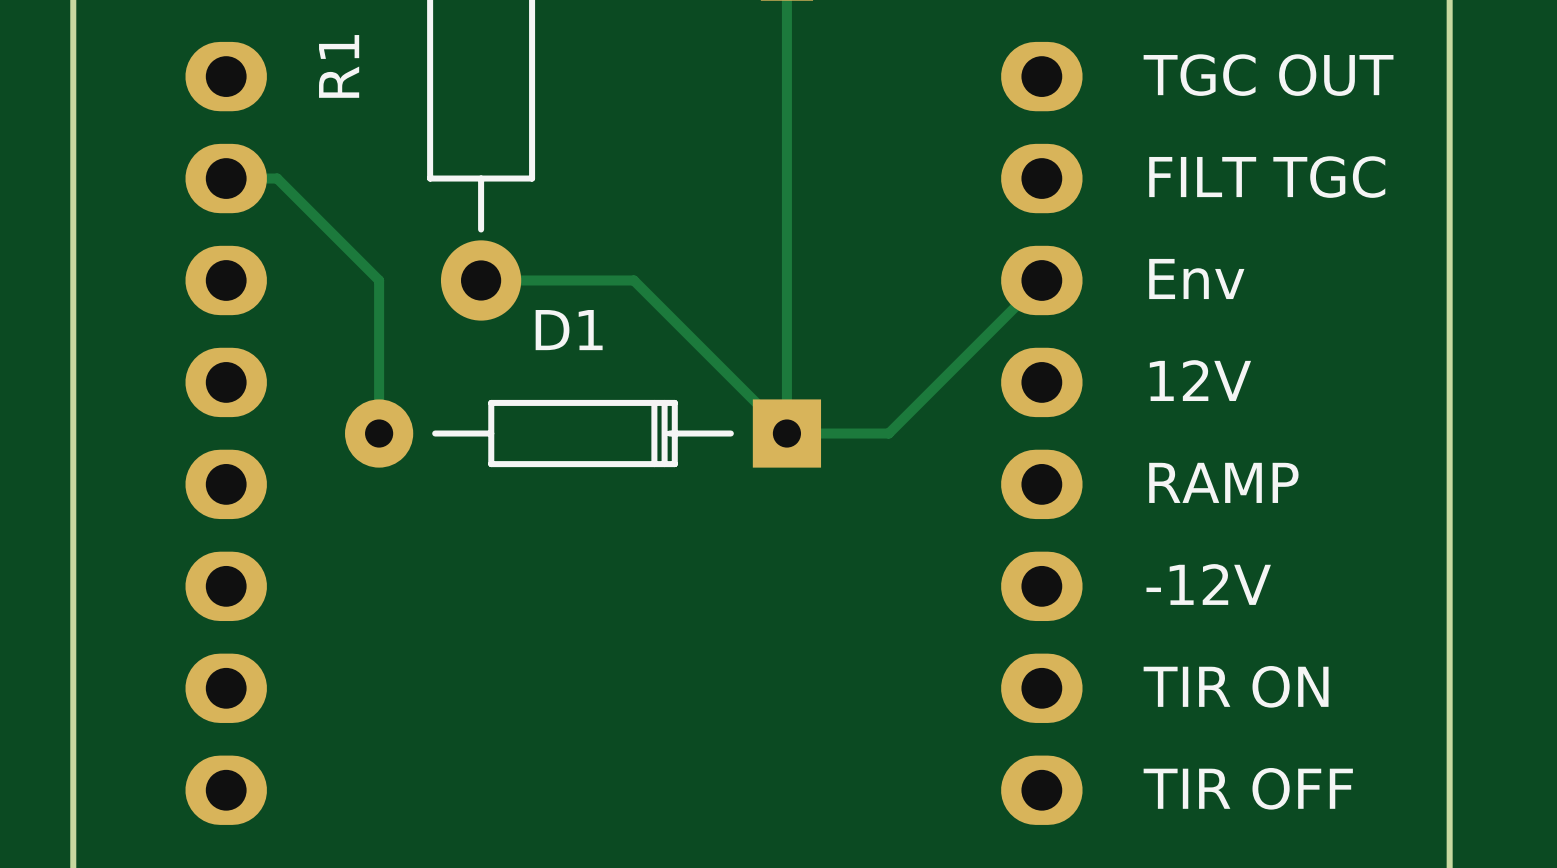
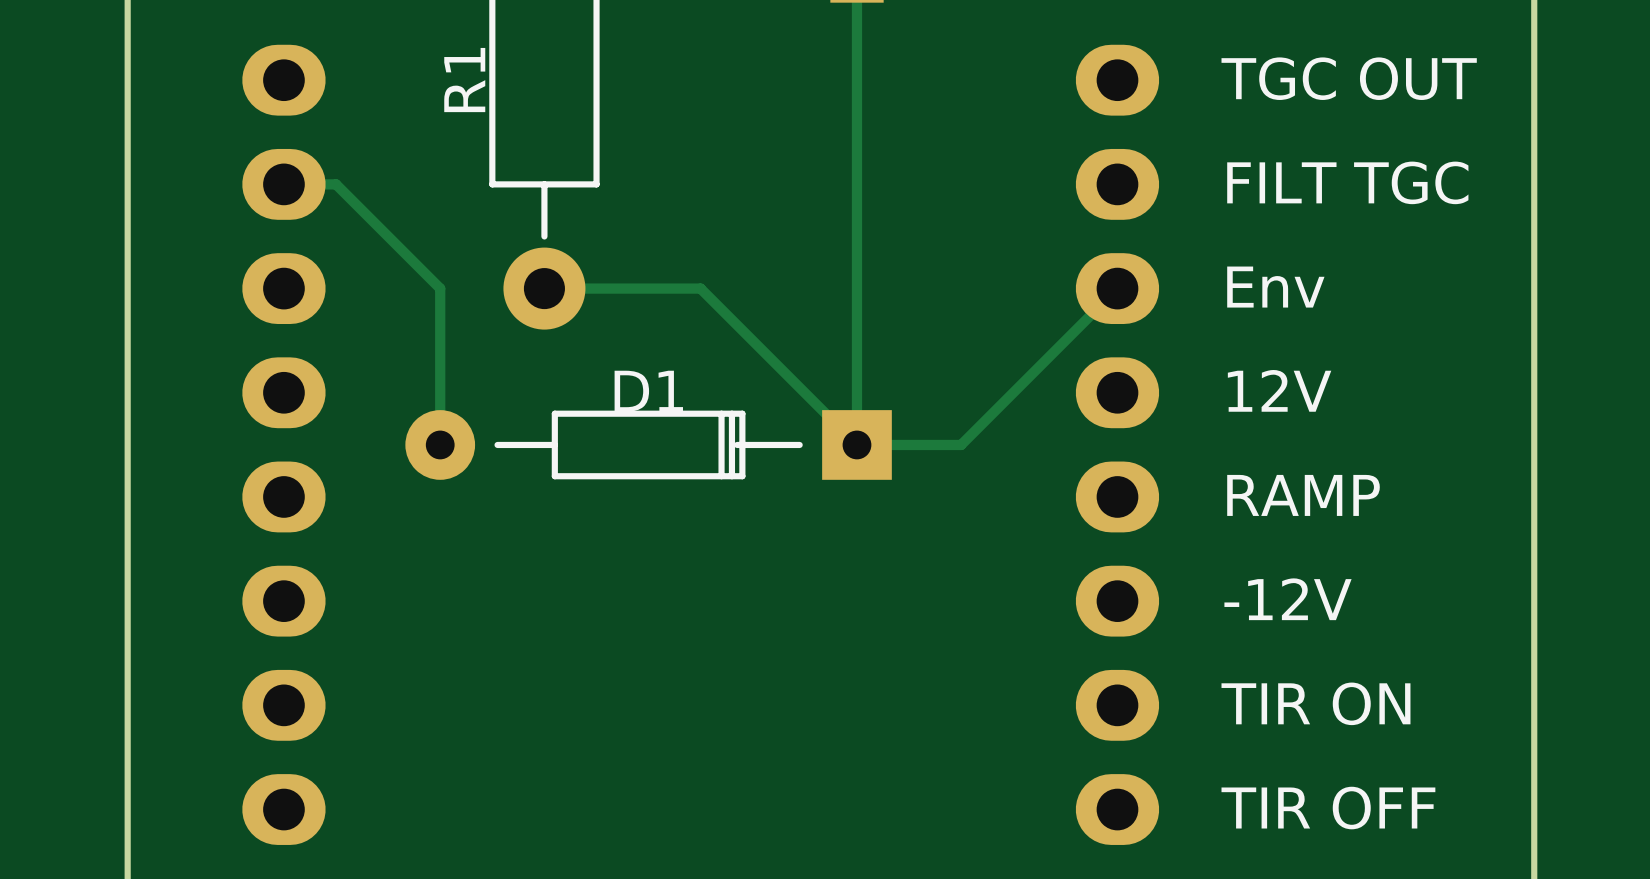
R1 name position: R1 (339, 66) -> R1 (464, 80)
D1 name position: D1 (569, 330) -> D1 (648, 391)

